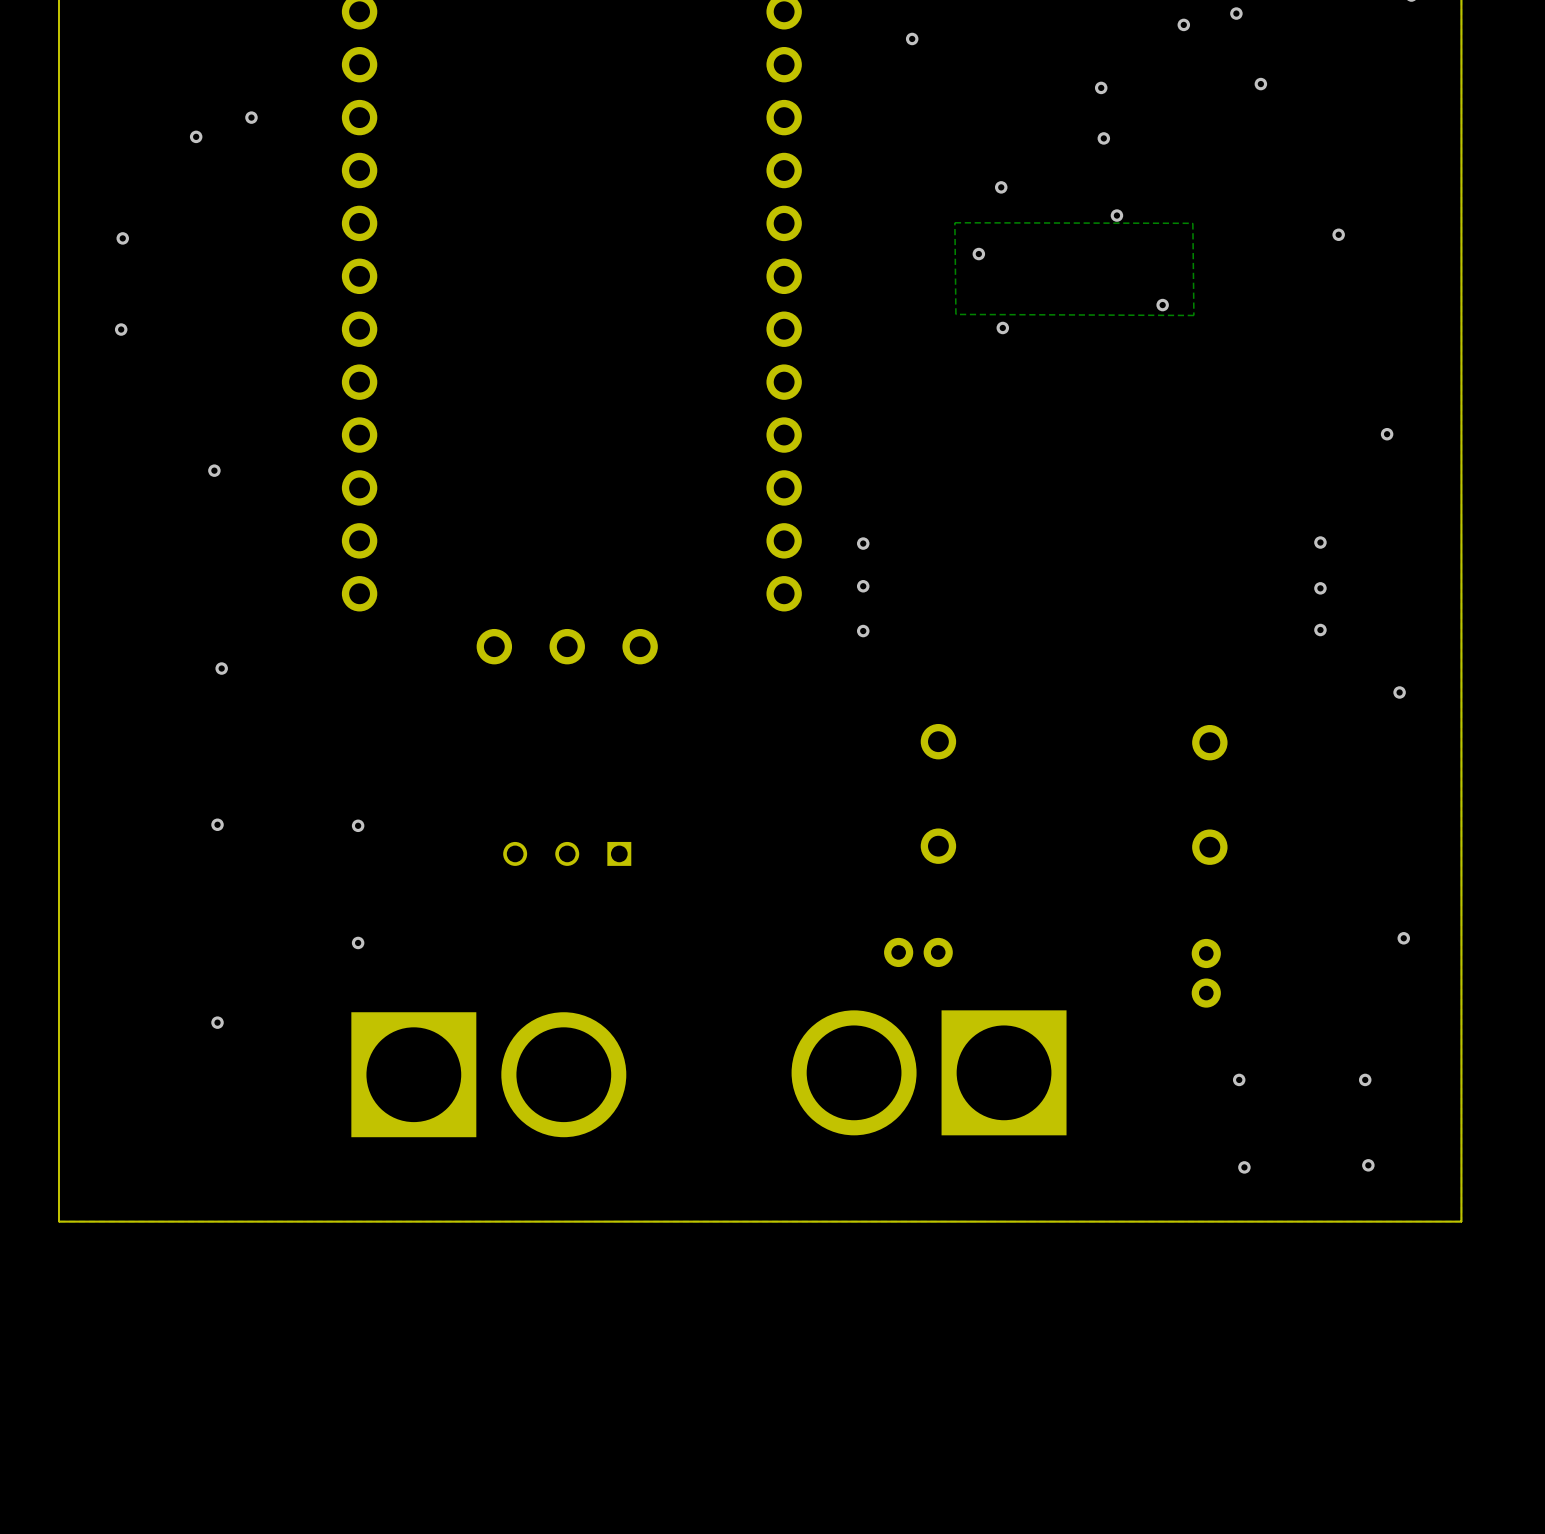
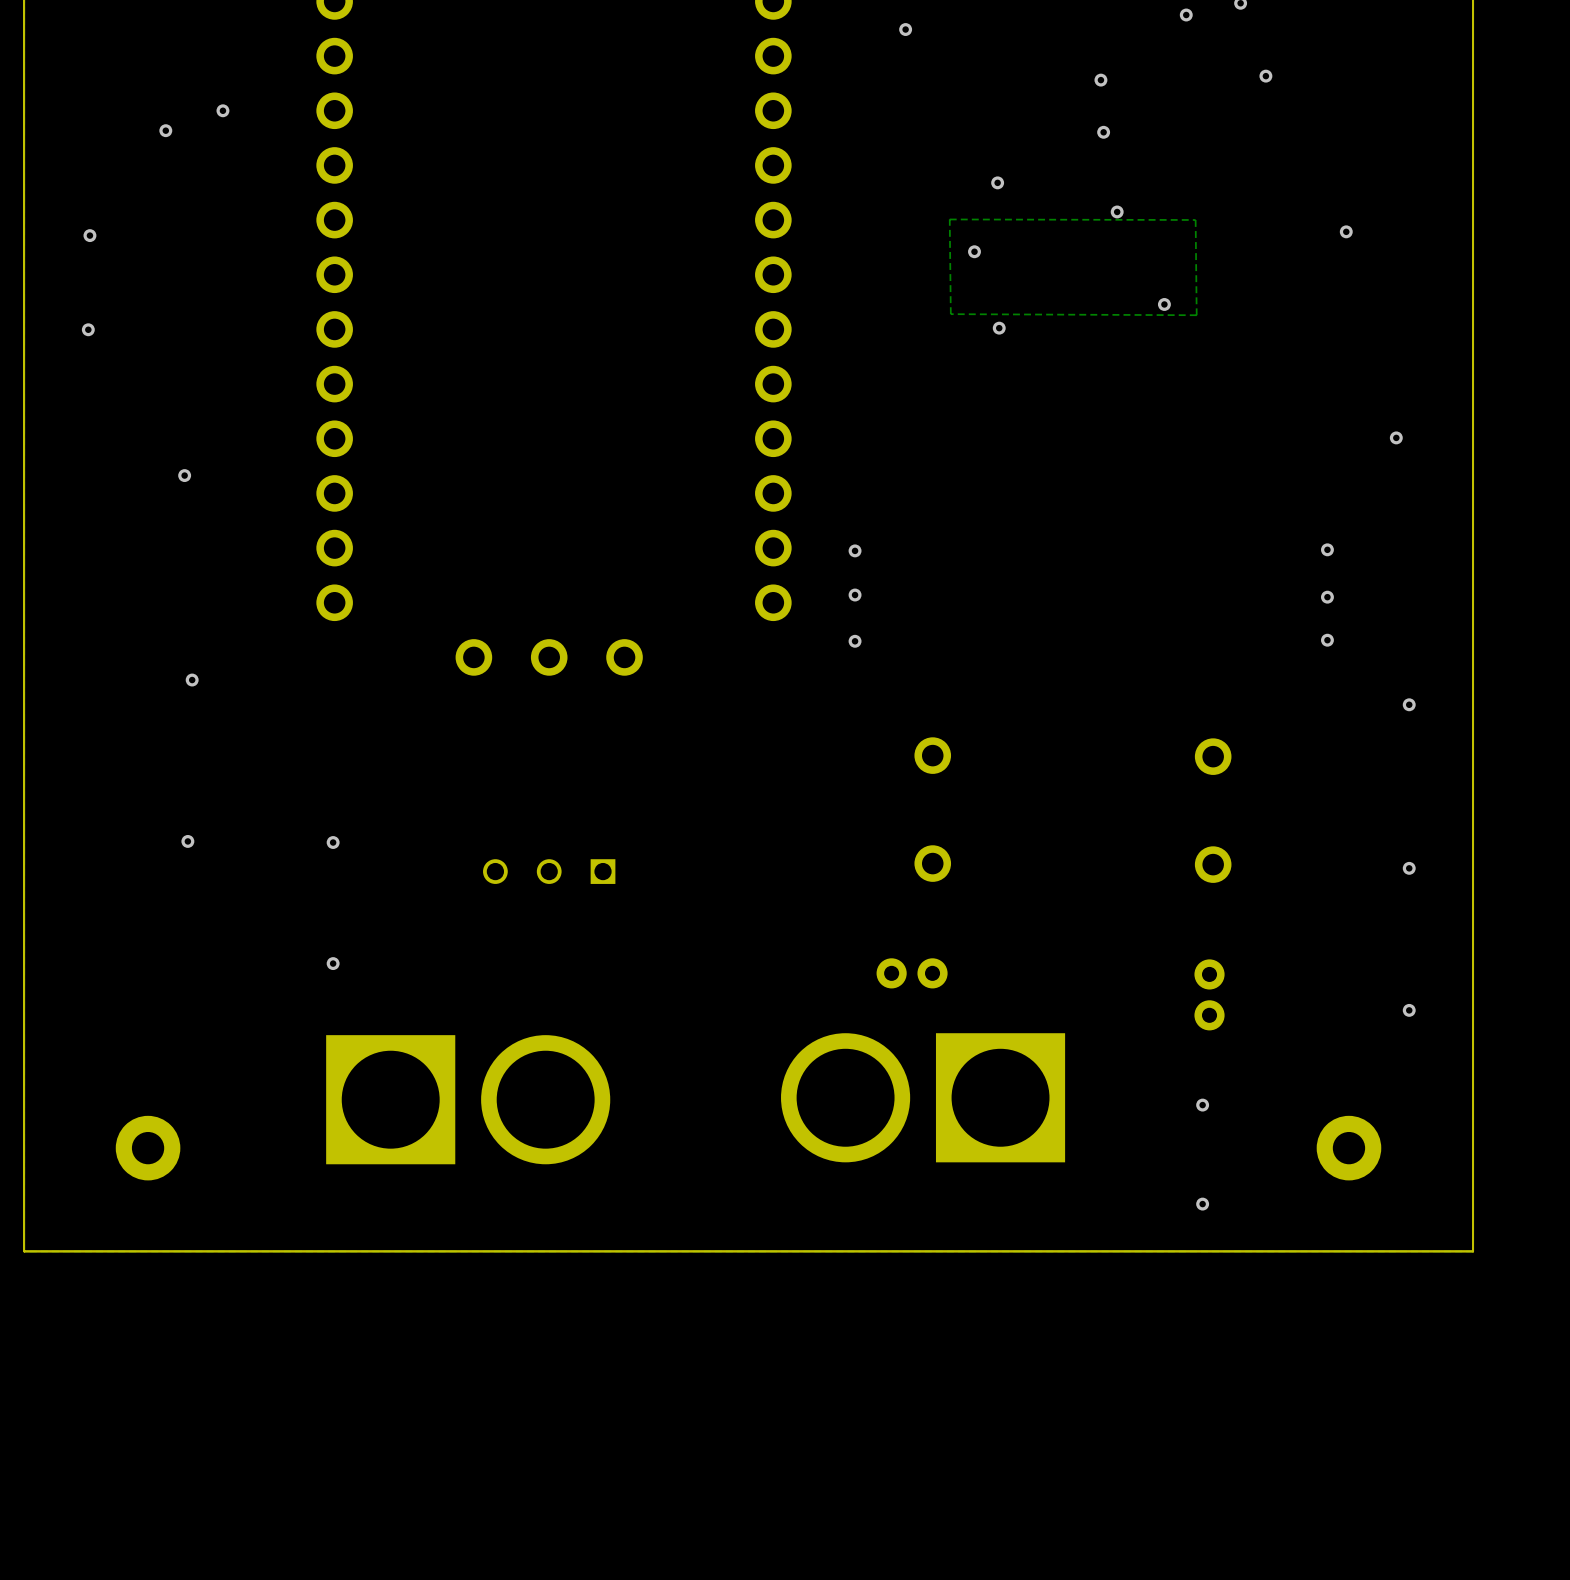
via: none -> (1409, 868)
via: (1403, 938) -> none
via: none -> (1409, 1010)
via: (217, 1022) -> none
via position: (1239, 1079) -> (1202, 1105)
via: (1365, 1079) -> none
part: none -> (148, 1148)
part: none -> (1348, 1148)
via: (1368, 1165) -> none
via position: (1244, 1167) -> (1202, 1204)

